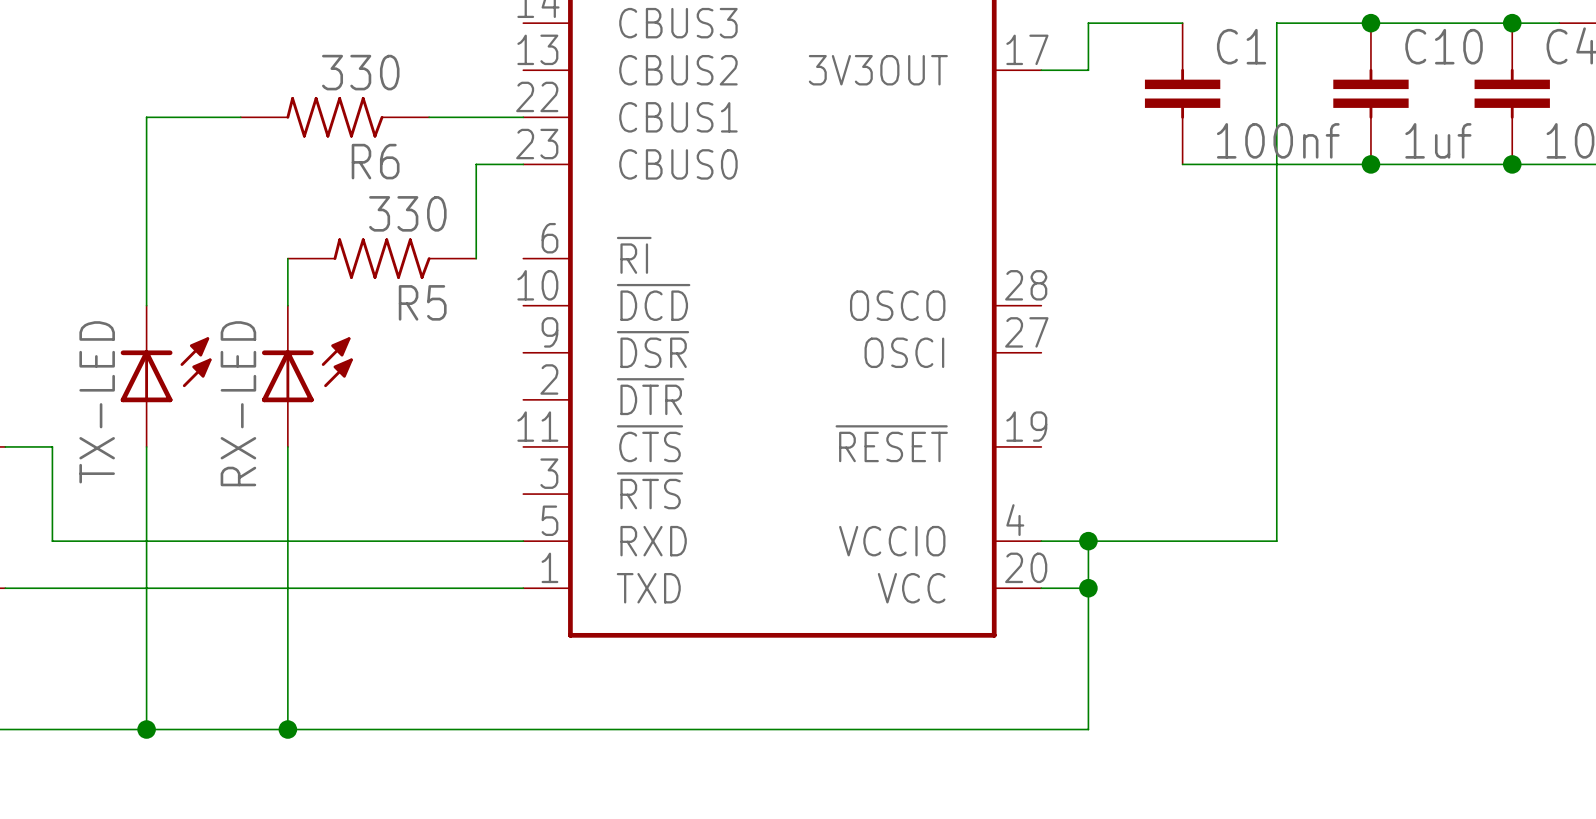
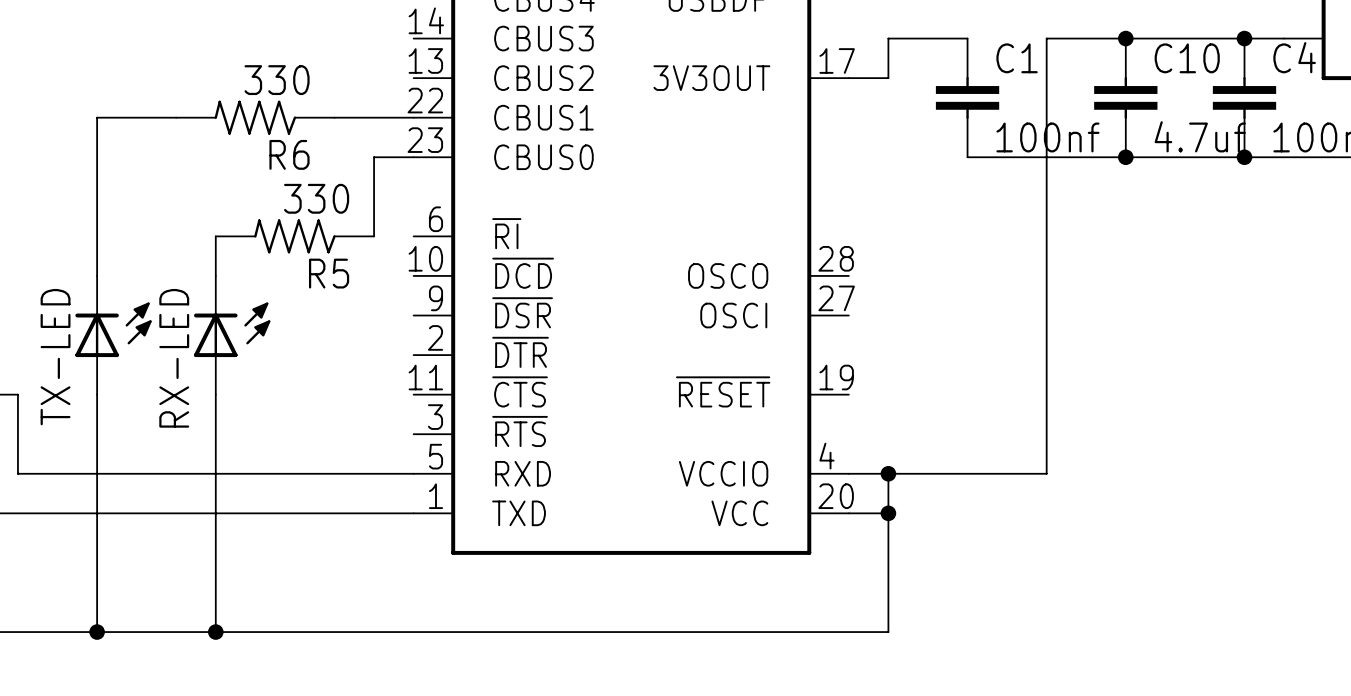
C10 value: 1uf (1438, 140) -> 4.7uf (1200, 136)

